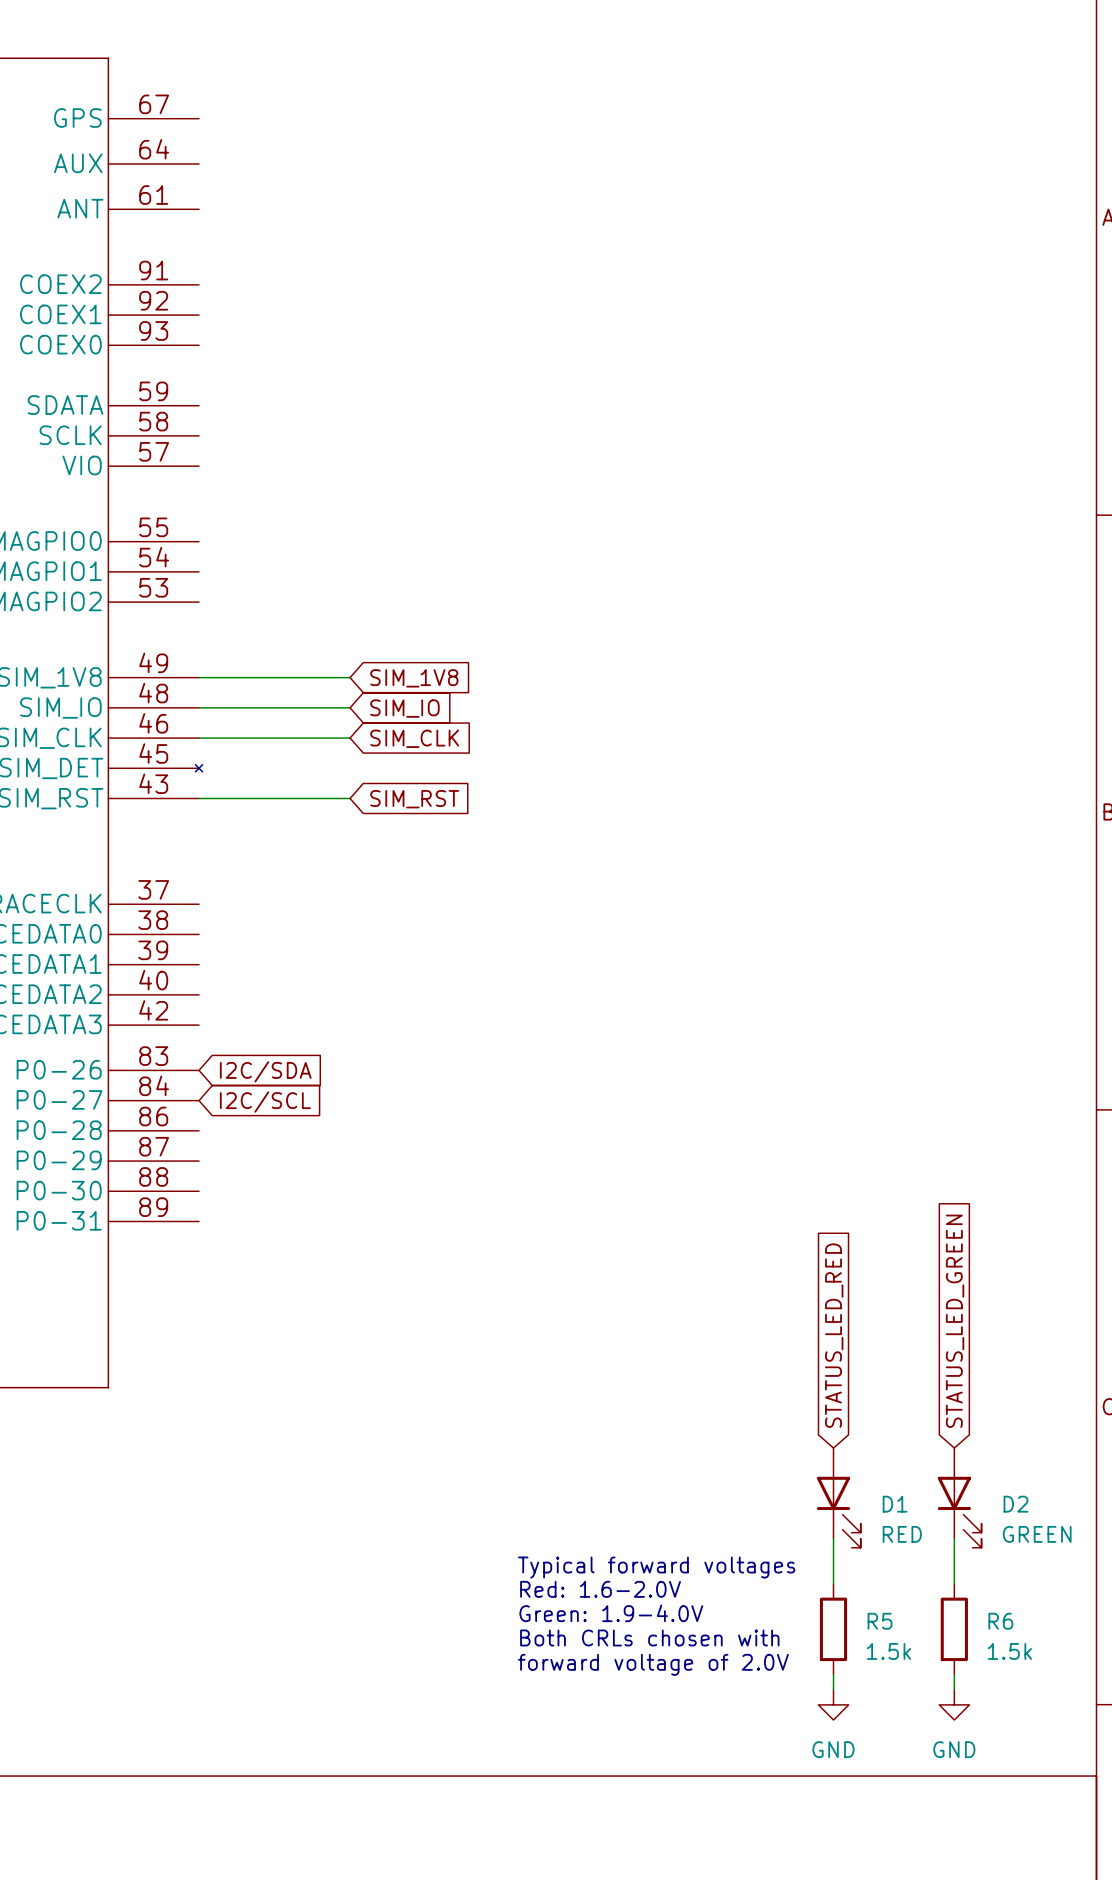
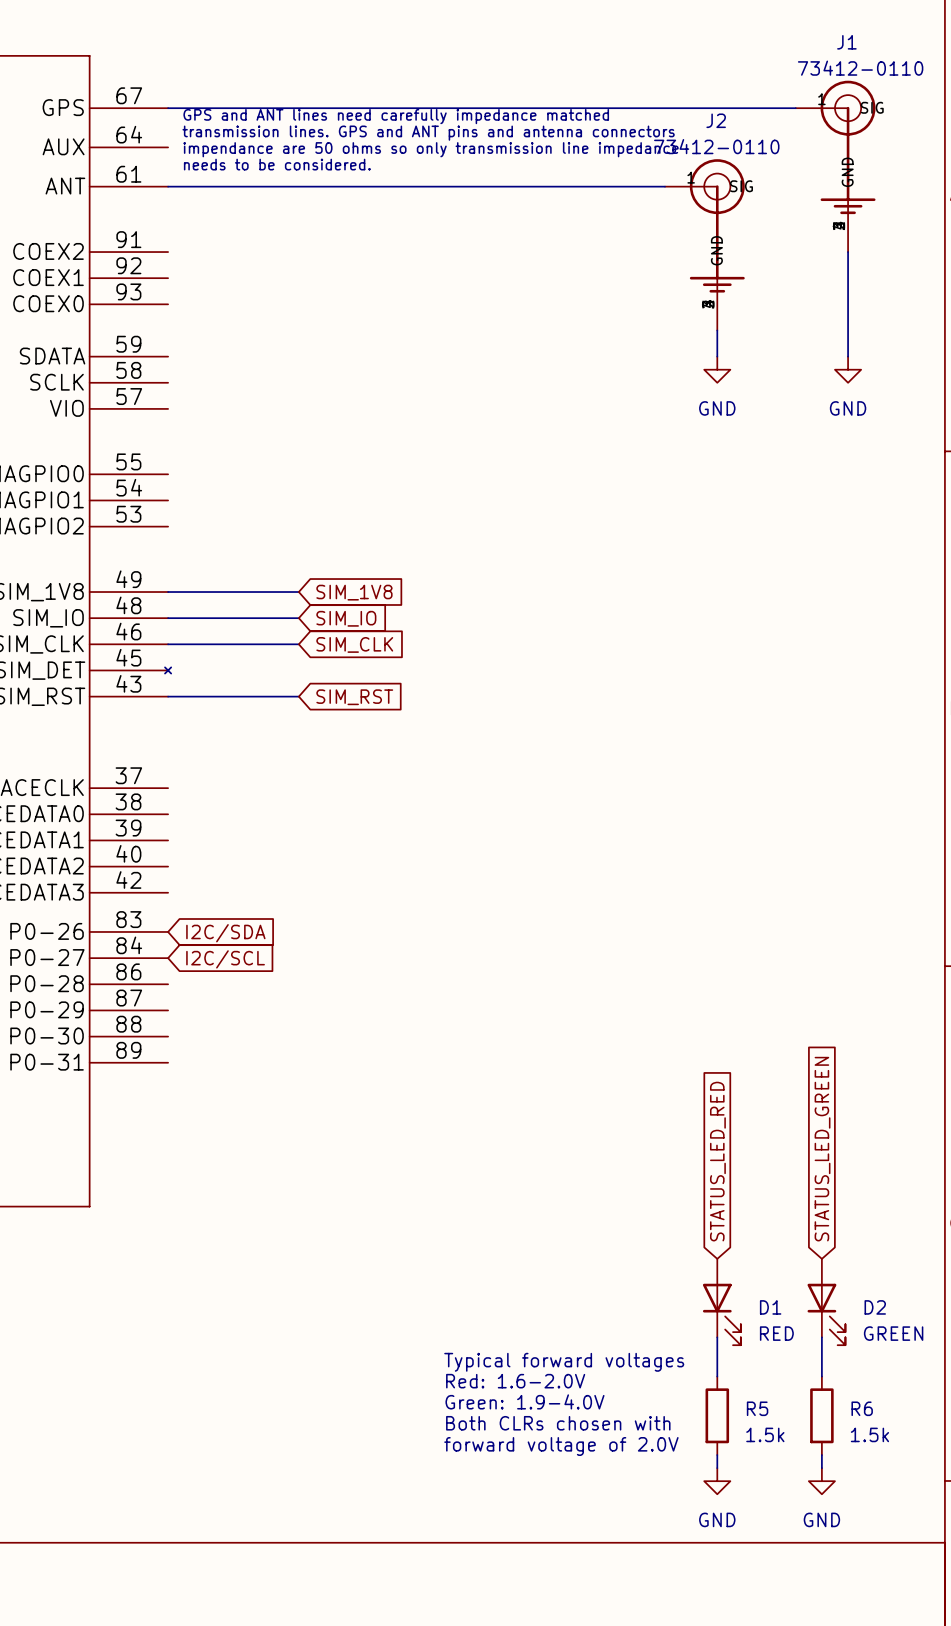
wire: none -> (168, 108) (795, 108)
text: none -> GPS and ANT lines need carefully impedance matched (396, 116)
text: none -> transmission lines. GPS and ANT pins and antenna connectors (428, 133)
text: none -> impendance are 50 ohms so only transmission line impedance (431, 149)
text: none -> needs to be considered. (277, 164)
J1: none -> 73412-0110 (835, 166)
wire: none -> (168, 186) (664, 186)
J2: none -> 73412-0110 (704, 244)
wire: none -> (848, 252) (848, 356)
wire: none -> (717, 330) (717, 356)
power symbol: none -> GND (717, 369)
power symbol: none -> GND (848, 369)
text: Both CRLs chosen with (649, 1637) -> Both CLRs chosen with (558, 1423)

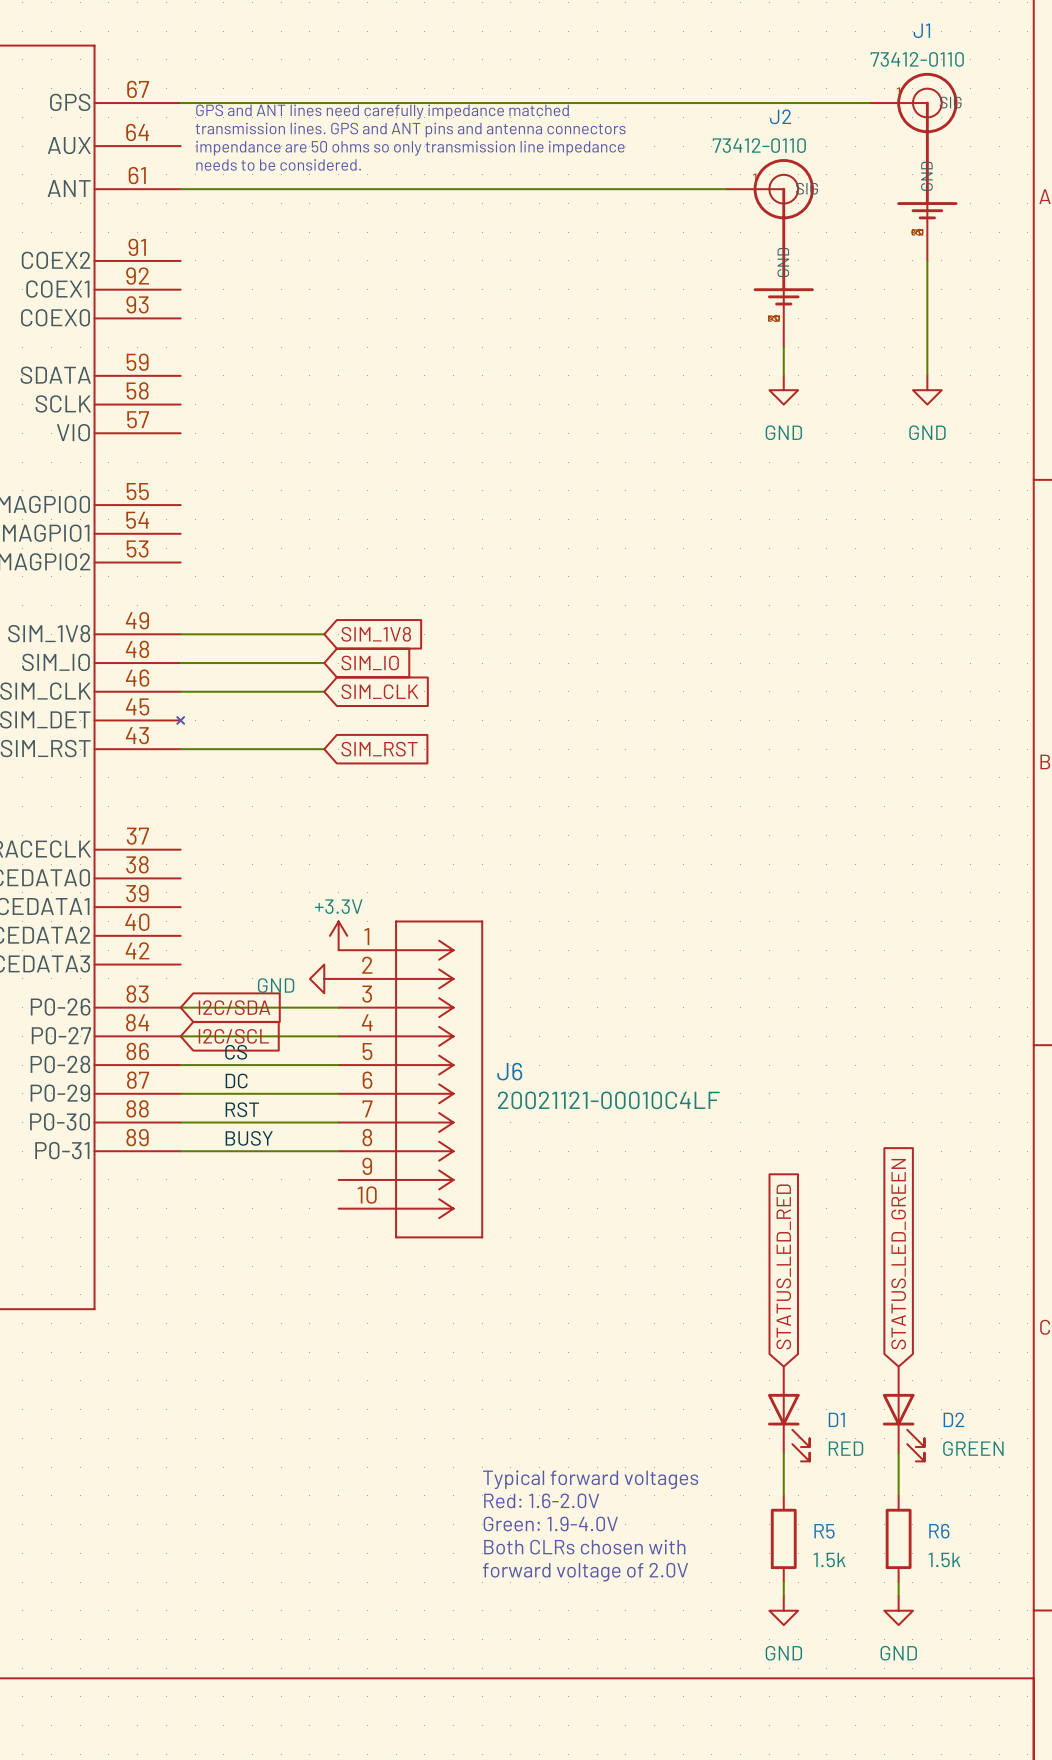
power symbol: none -> +3.3V (338, 935)
power symbol: none -> GND (324, 978)
wire: none -> (180, 1007) (338, 1007)
wire: none -> (180, 1036) (338, 1036)
label: none -> CS (236, 1052)
wire: none -> (180, 1065) (338, 1065)
J6: none -> 20021121-00010C4LF (410, 1079)
label: none -> DC (236, 1080)
wire: none -> (180, 1093) (338, 1093)
label: none -> RST (242, 1109)
wire: none -> (180, 1122) (338, 1122)
label: none -> BUSY (249, 1138)
wire: none -> (180, 1151) (338, 1151)

